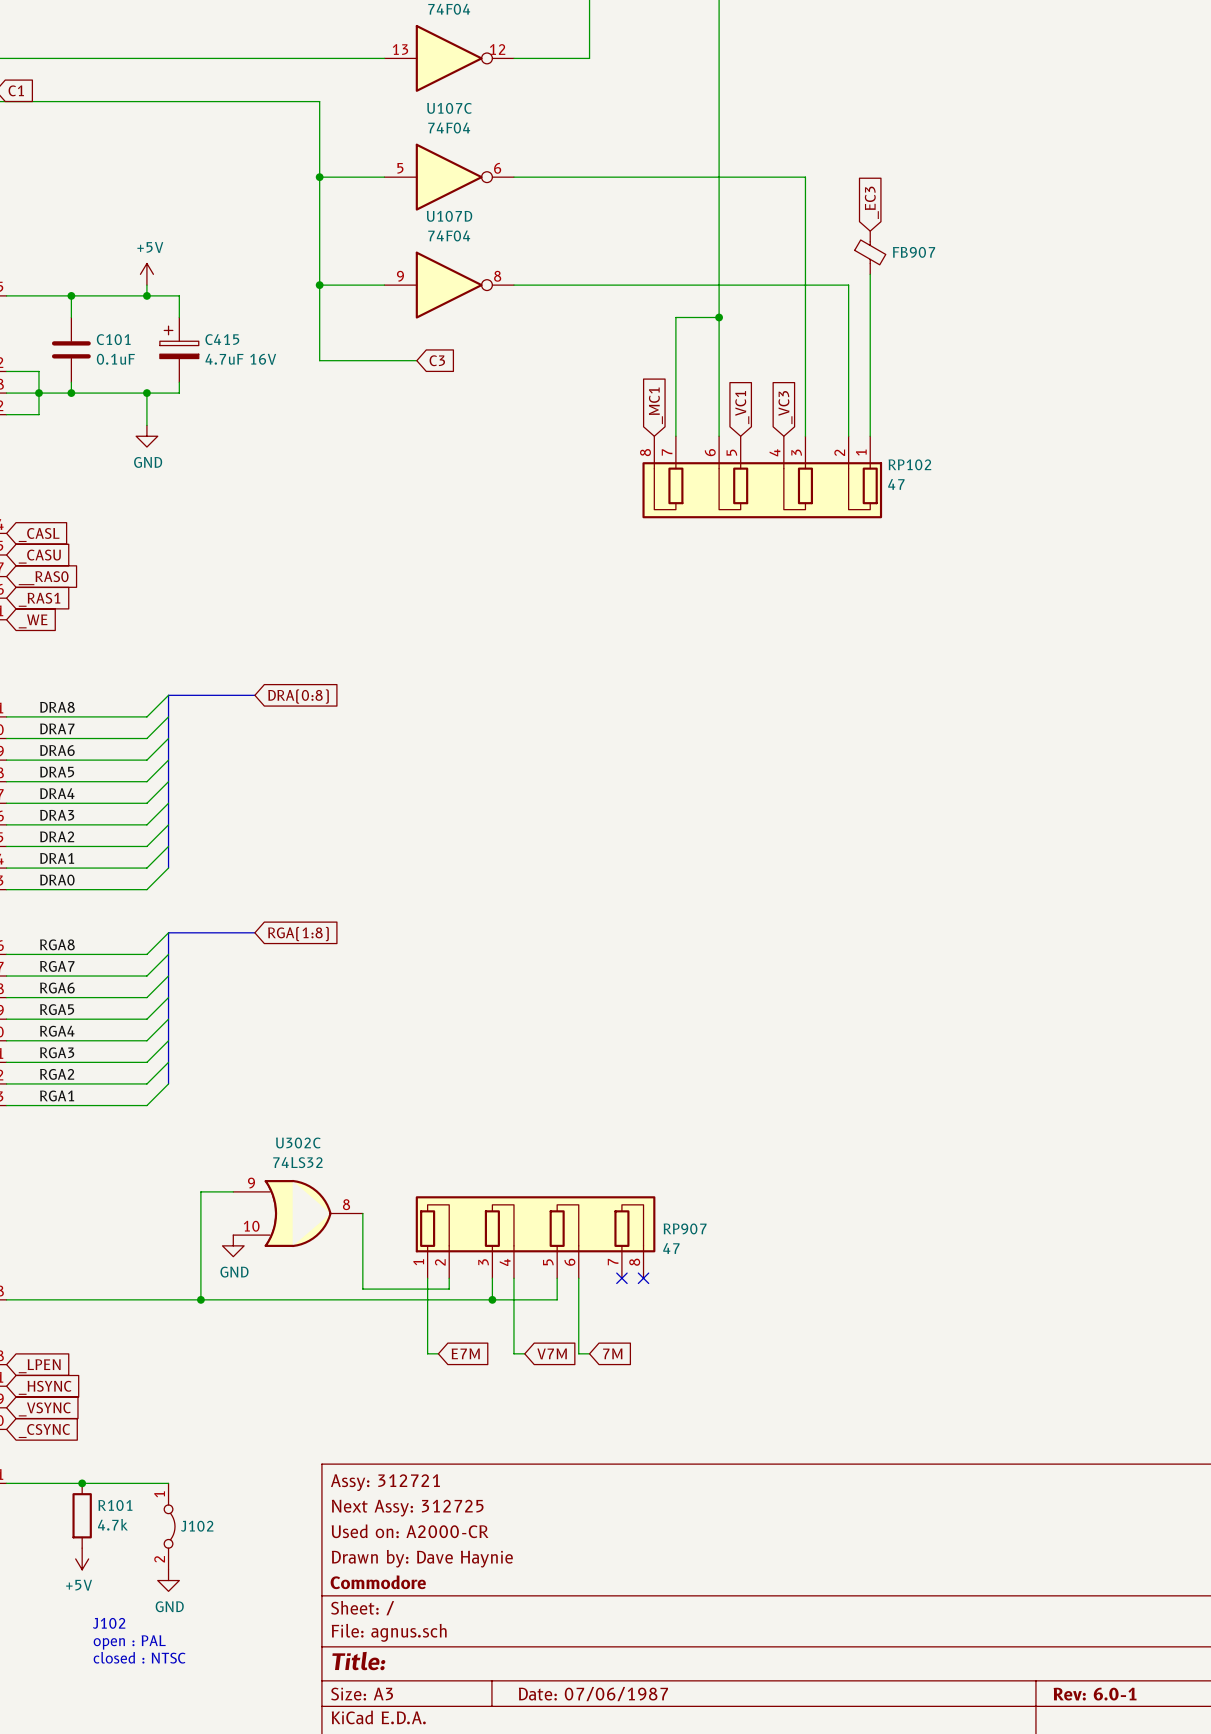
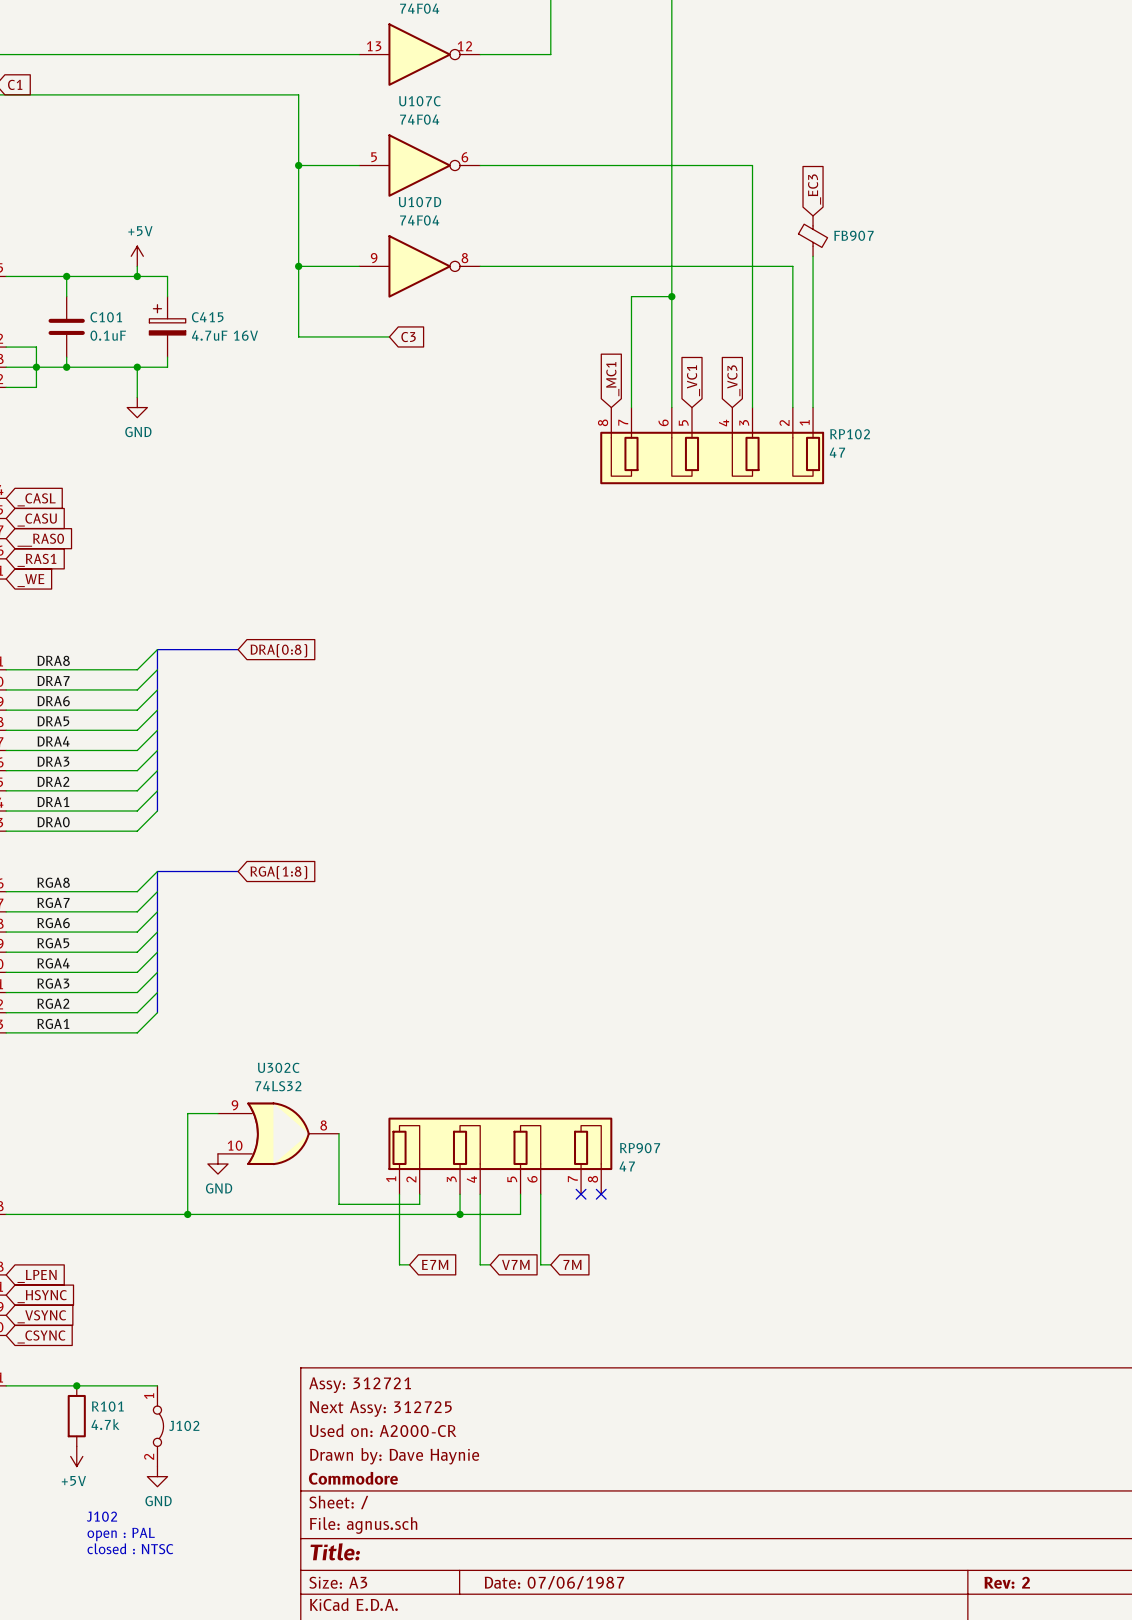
title block: Rev: 6.0-1 (1095, 1694) -> Rev: 2 (1007, 1582)

